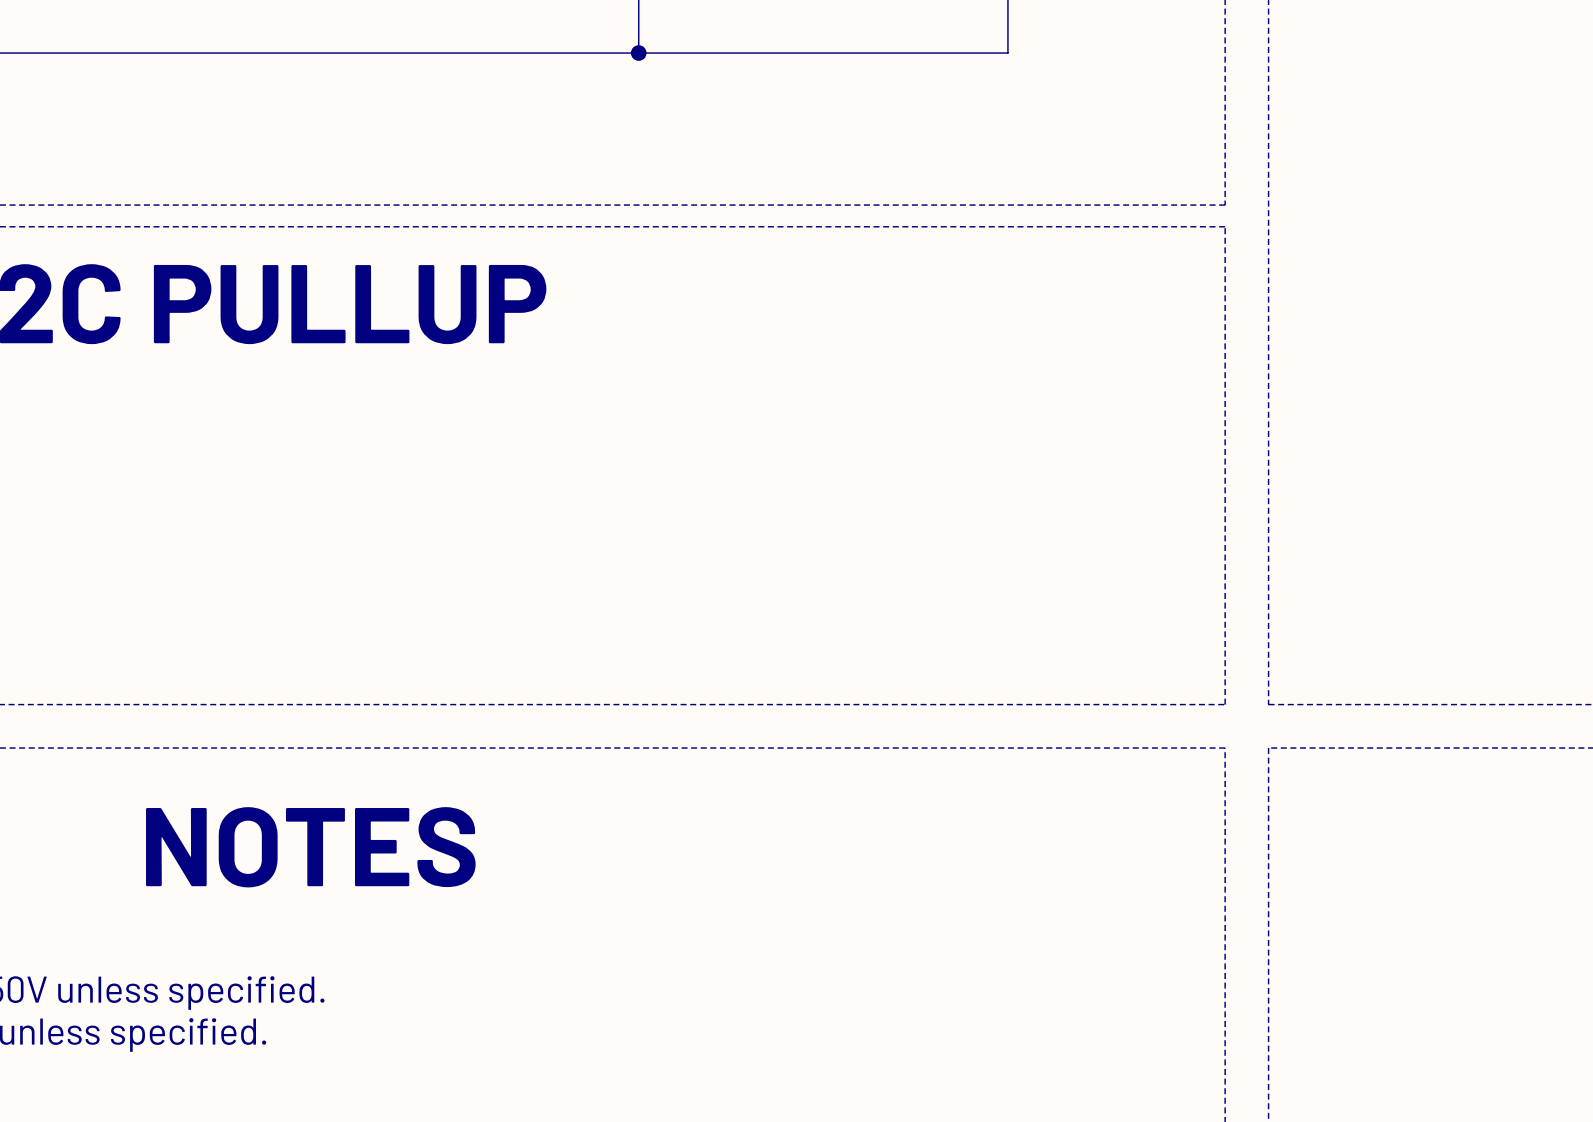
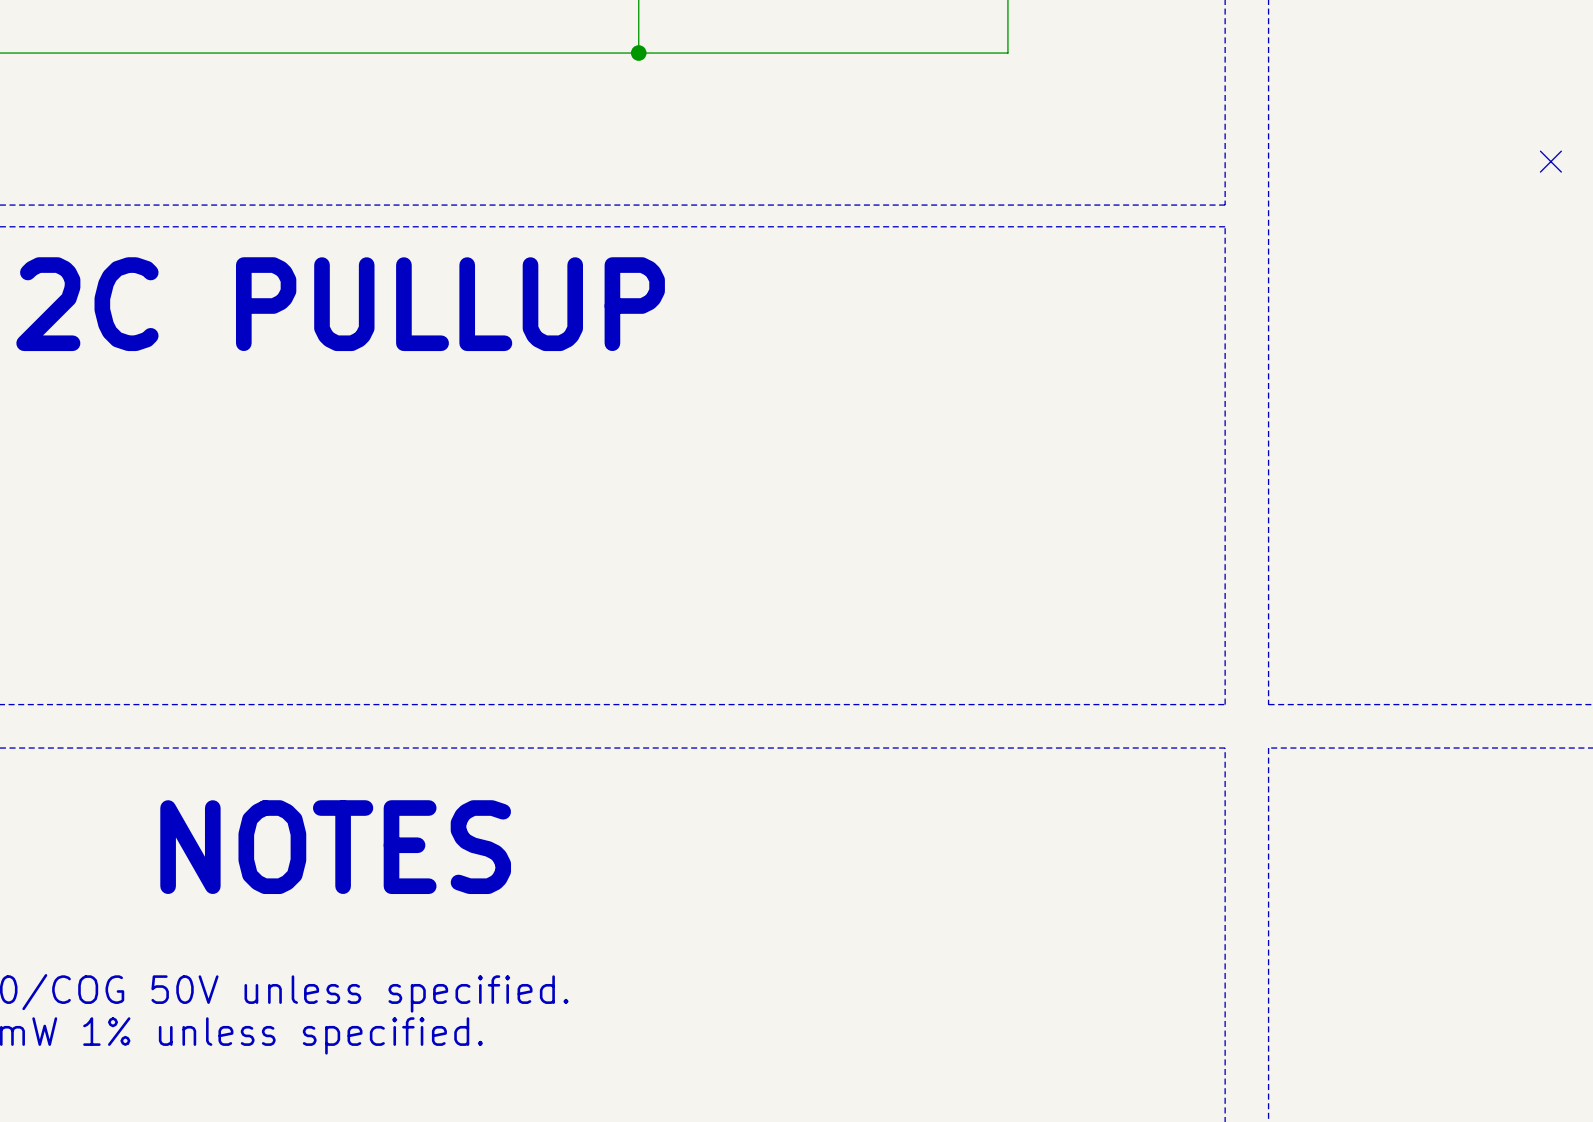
no-connect mark: none -> (1550, 161)

